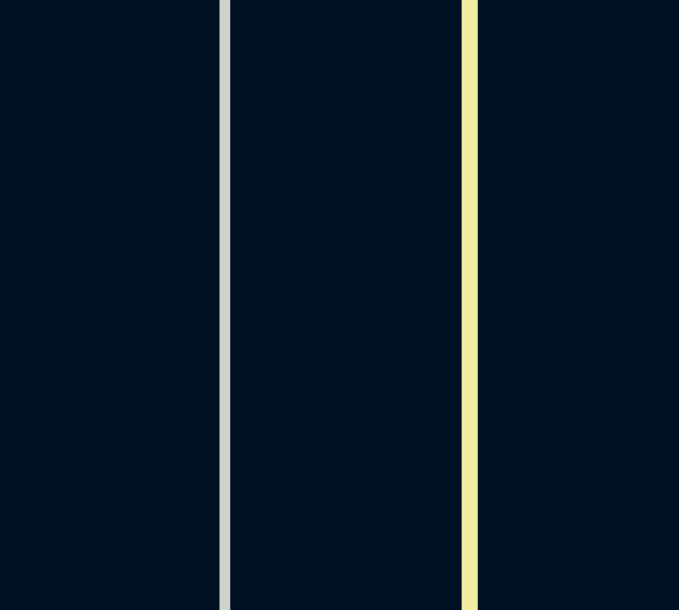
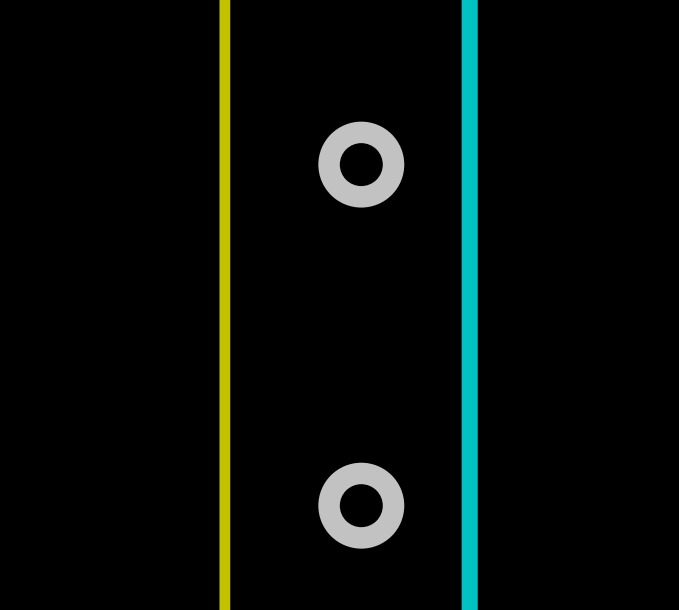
via: none -> (361, 164)
via: none -> (361, 505)

